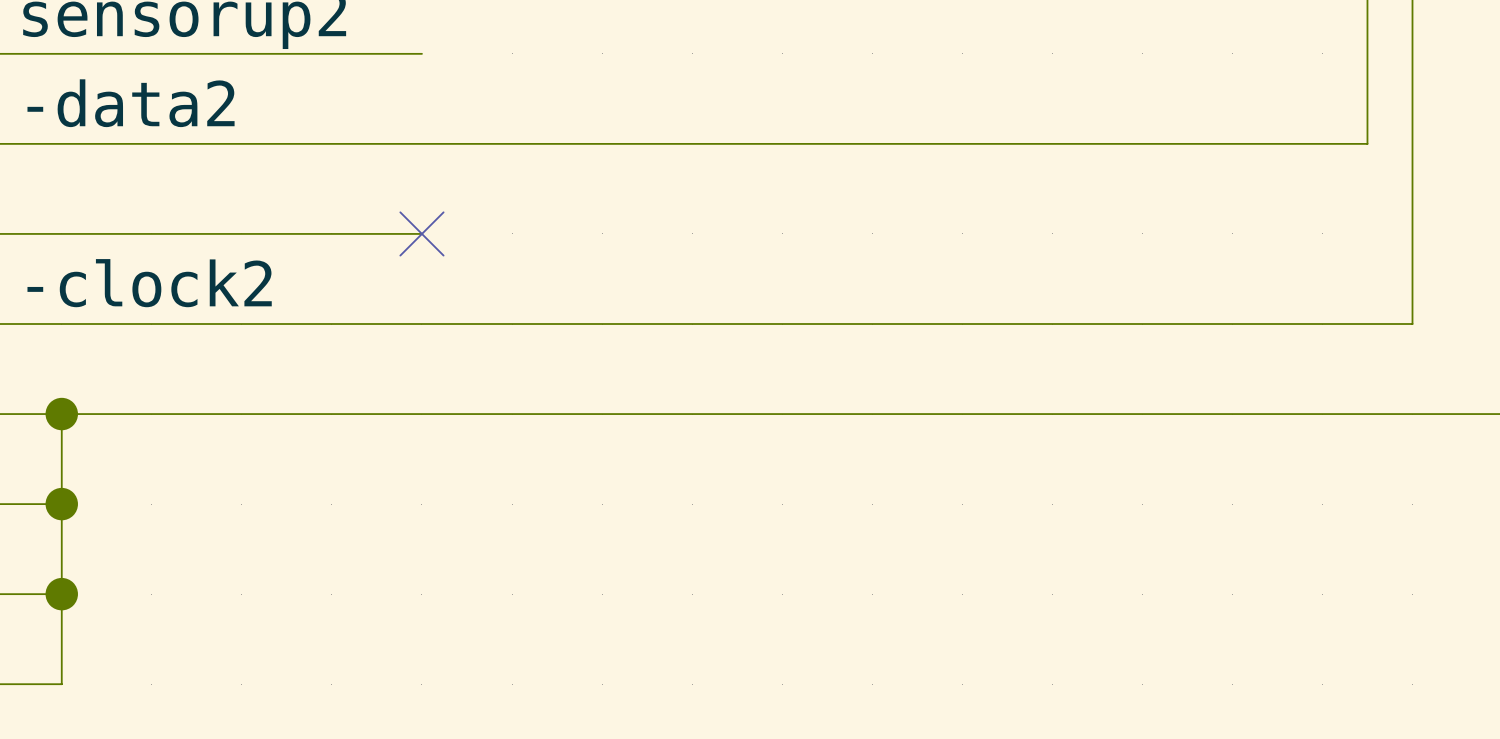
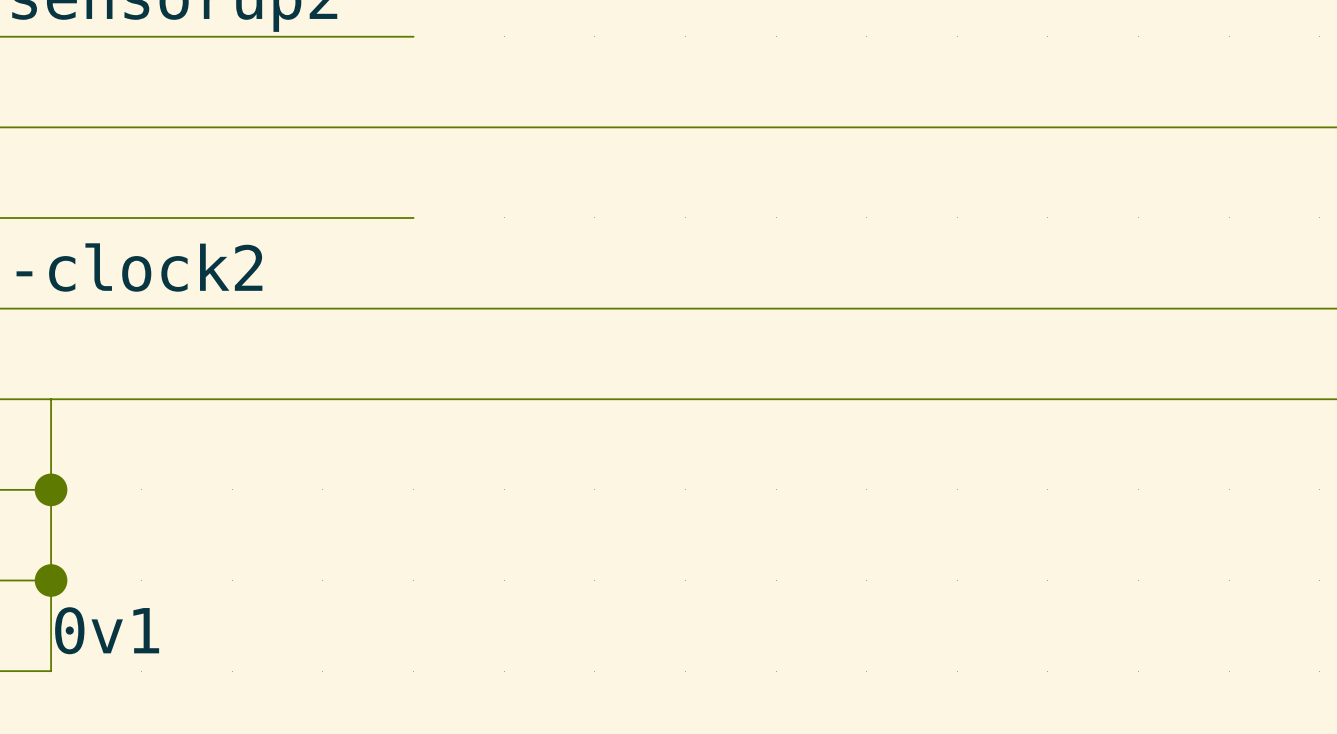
label: -data2 (131, 103) -> none
no-connect mark: (421, 233) -> none
junction: (61, 414) -> none
label: none -> 0v1 (107, 630)

